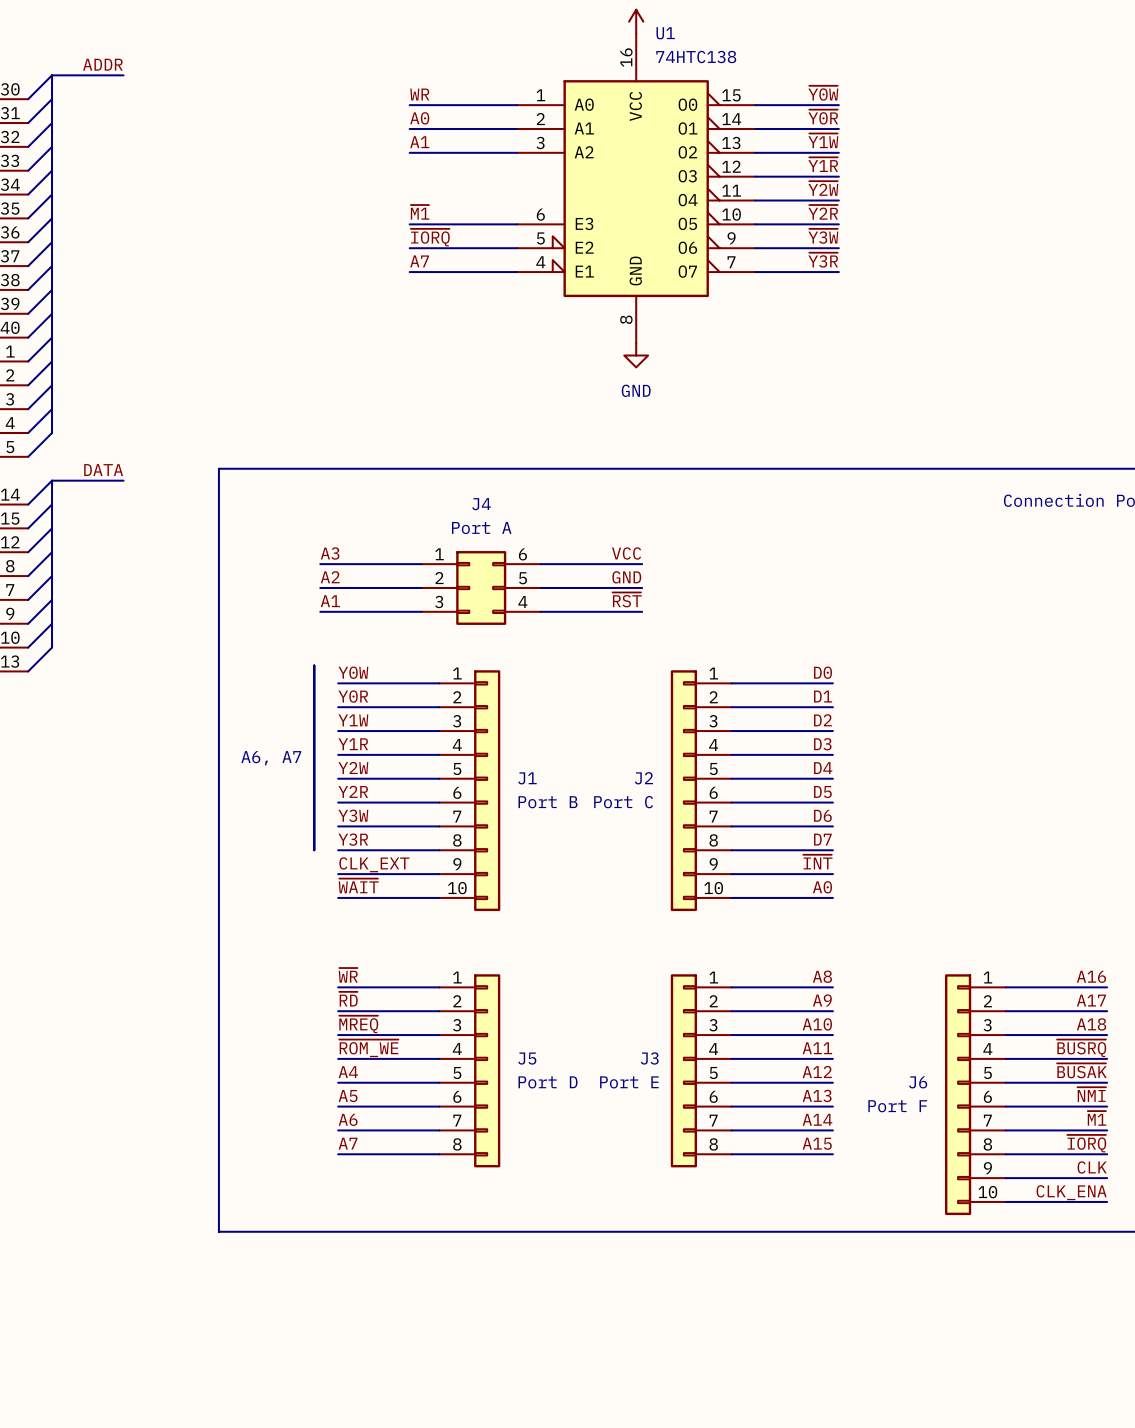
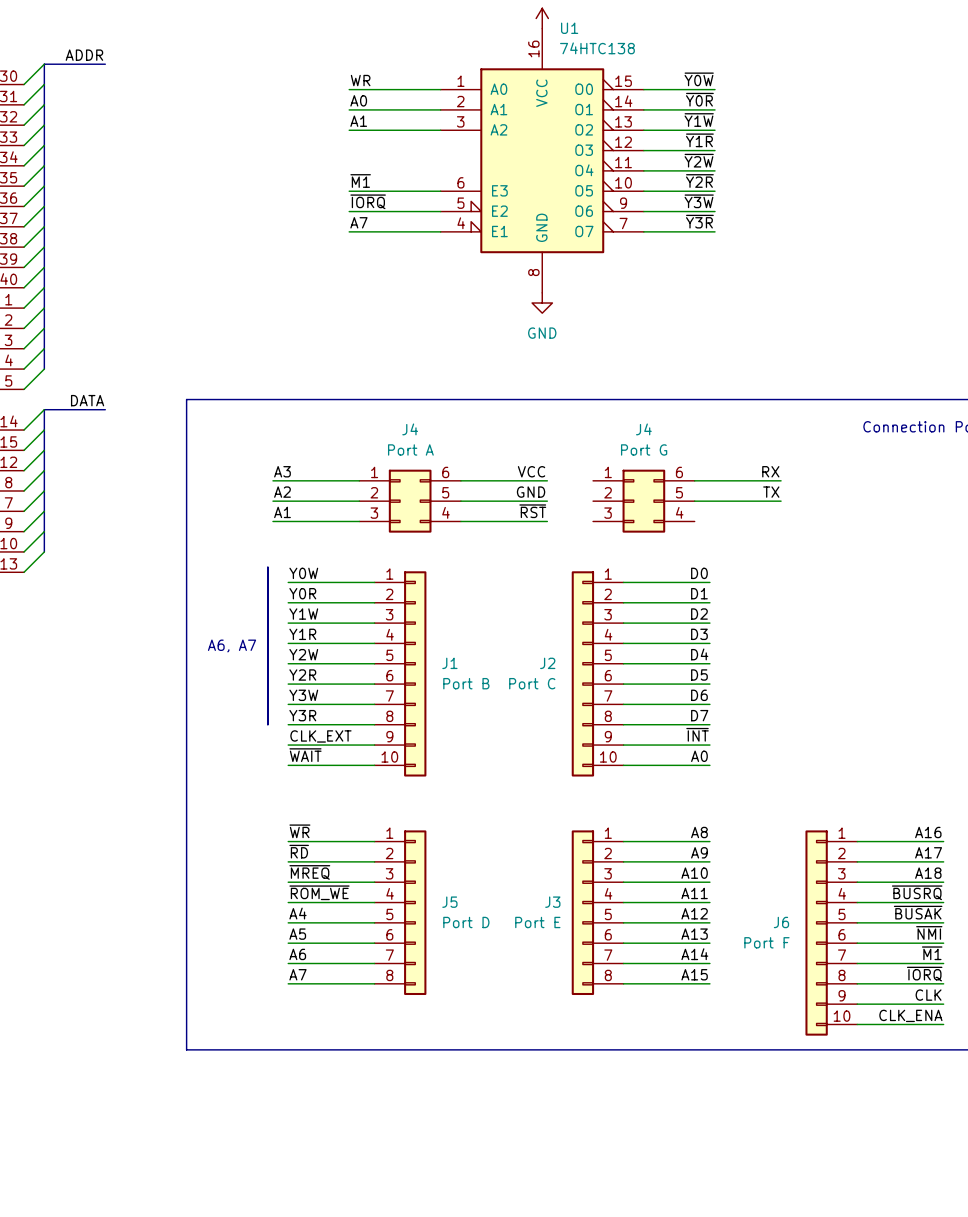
label: none -> RX (770, 471)
wire: none -> (694, 480) (781, 480)
label: none -> TX (771, 492)
J4: none -> Port G (643, 501)
wire: none -> (694, 501) (781, 501)

